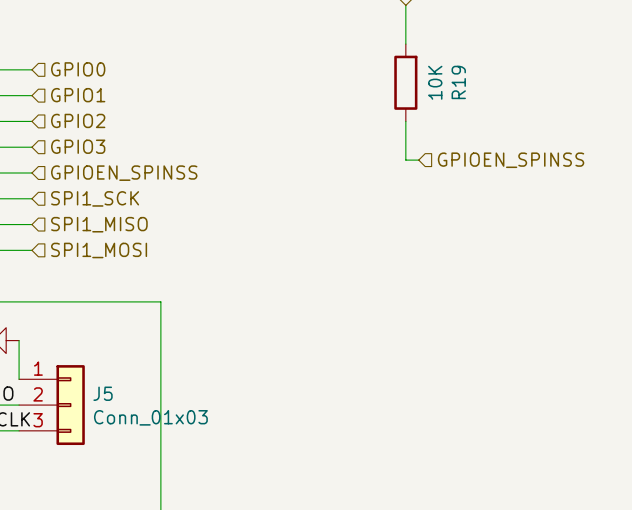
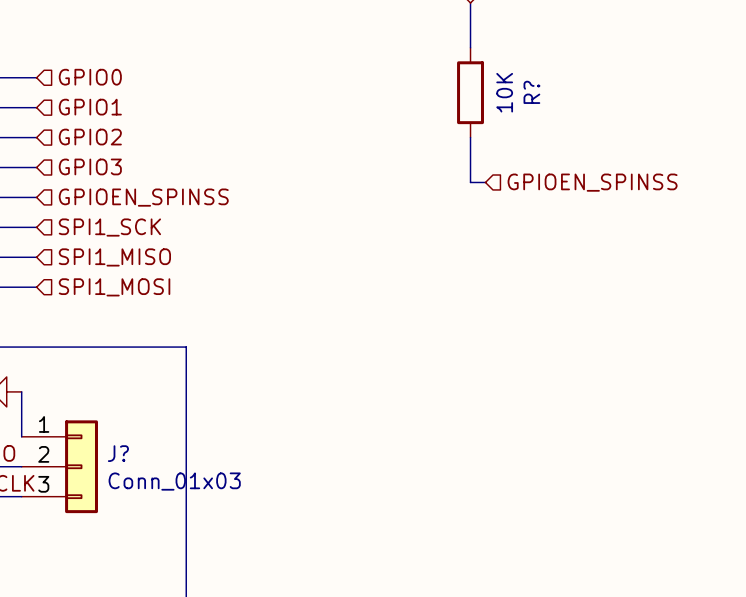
R19 name: R19 (458, 82) -> R? (531, 92)
J5 name: J5 (103, 393) -> J? (118, 453)

